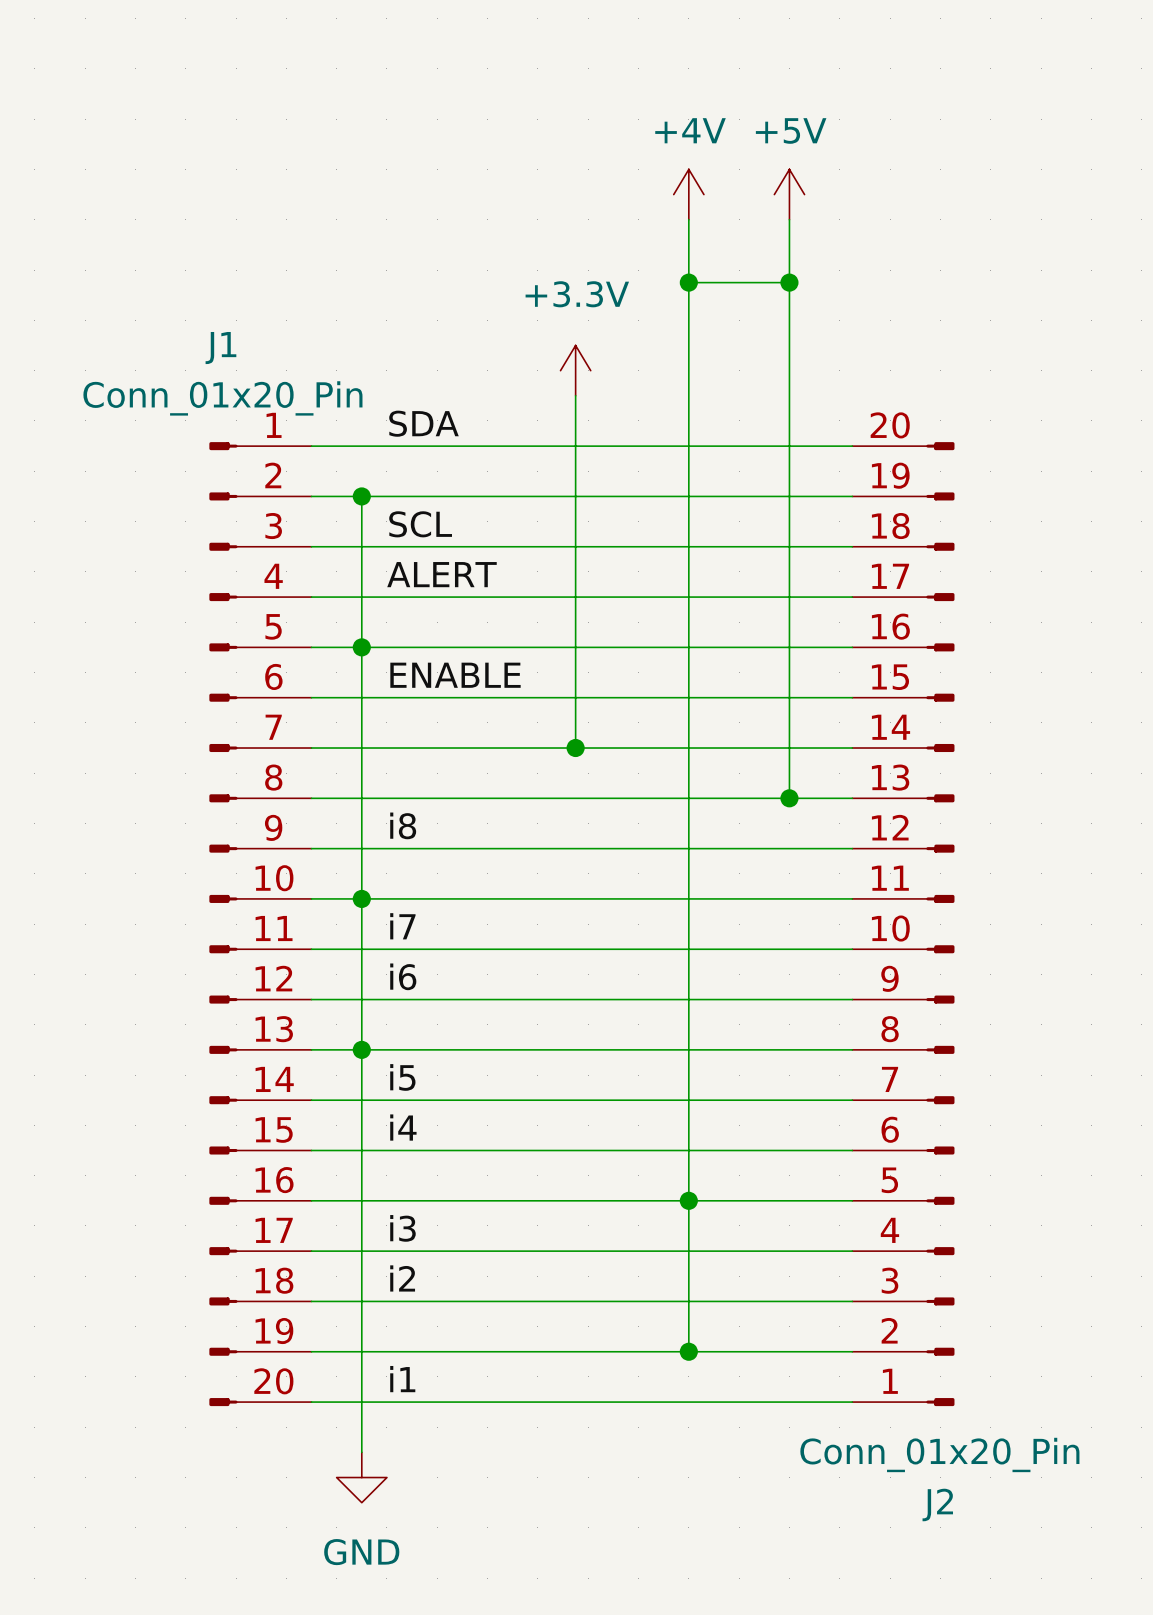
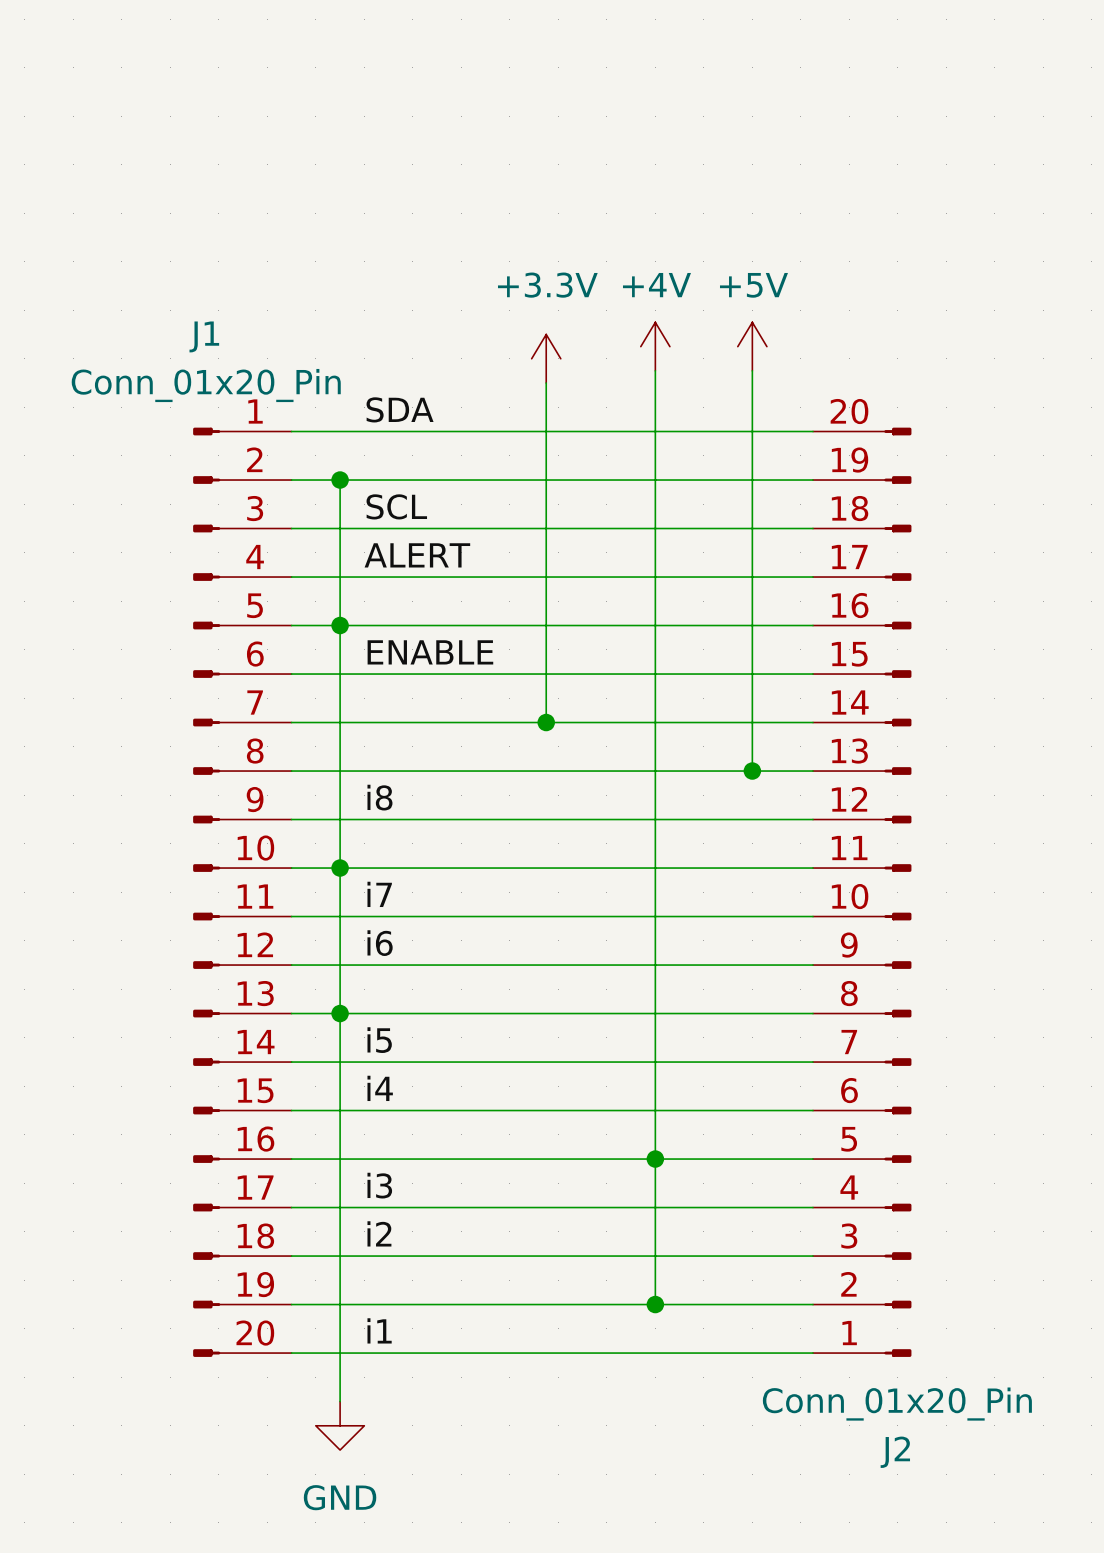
power symbol position: +4V (688, 194) -> +4V (655, 346)
power symbol position: +5V (789, 194) -> +5V (752, 346)
wire: (688, 219) (688, 383) -> none
wire: (789, 219) (789, 383) -> none
wire: (688, 282) (789, 282) -> none
junction: (688, 282) -> none
junction: (789, 282) -> none

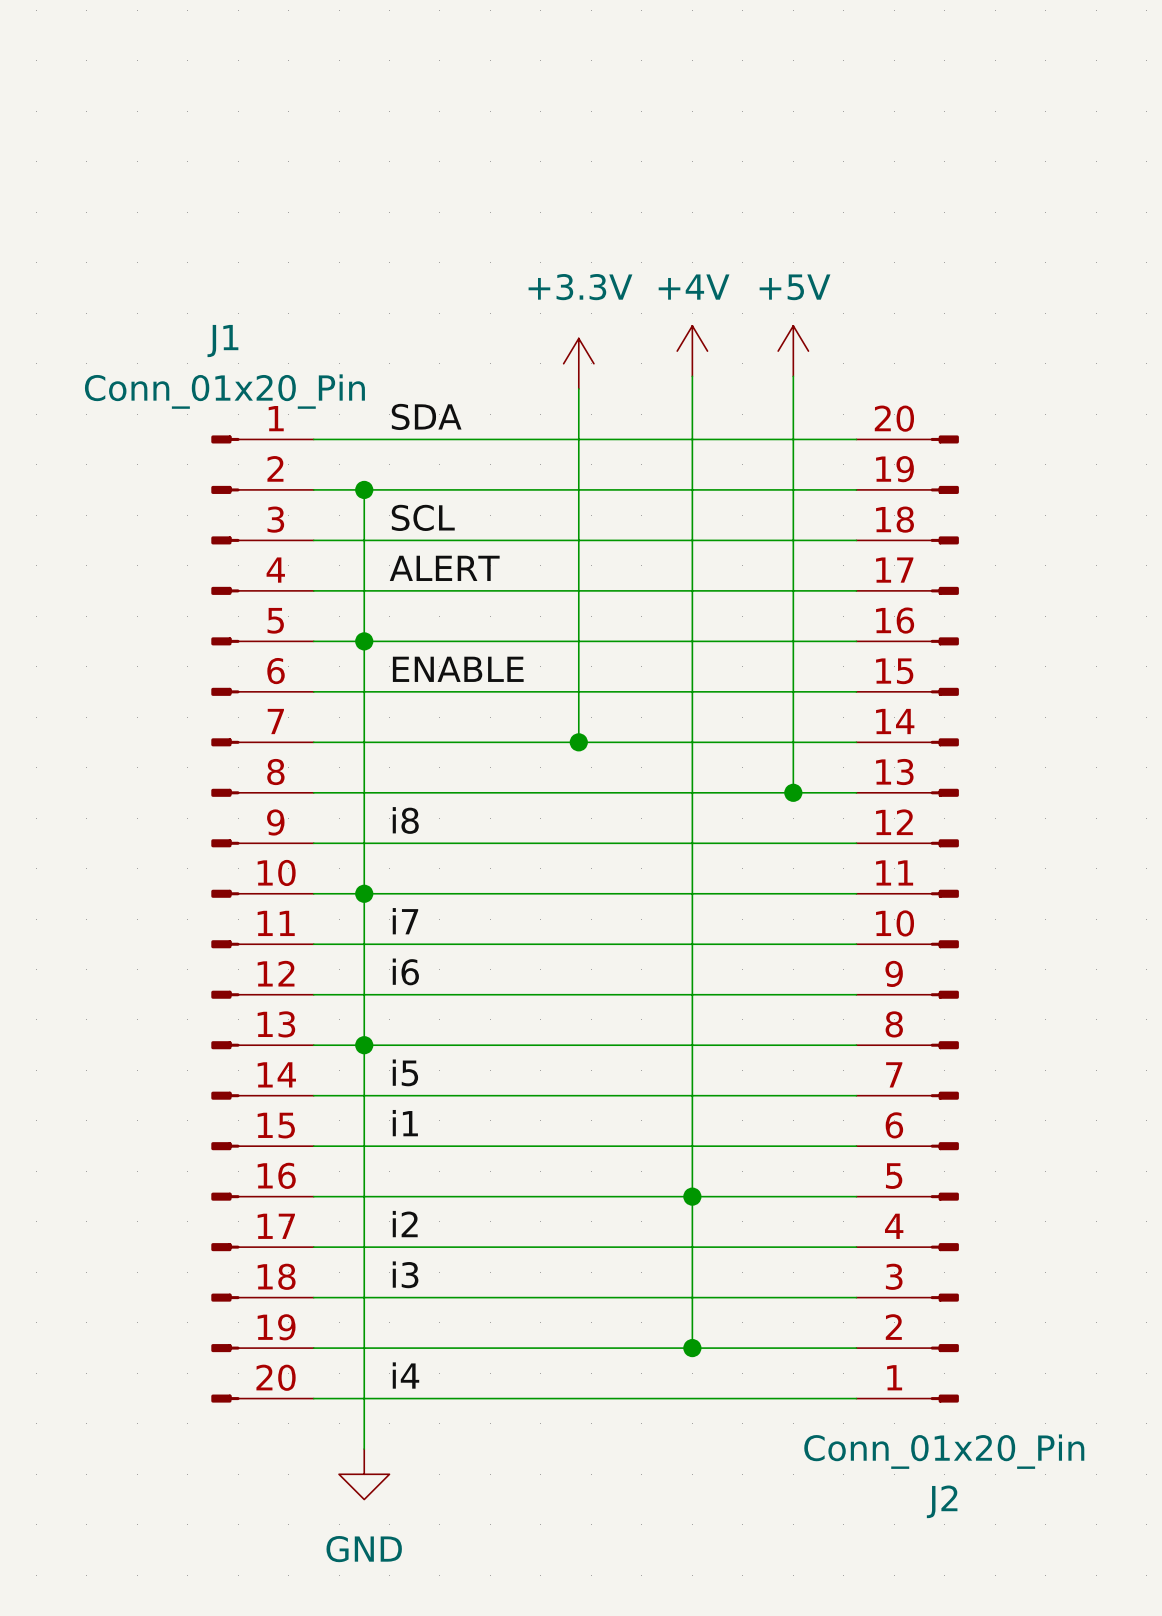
label: i4 (380, 1088) -> i1 (405, 1123)
label: i3 (379, 1185) -> i2 (405, 1224)
label: i2 (379, 1233) -> i3 (405, 1274)
label: i1 (379, 1330) -> i4 (405, 1375)

